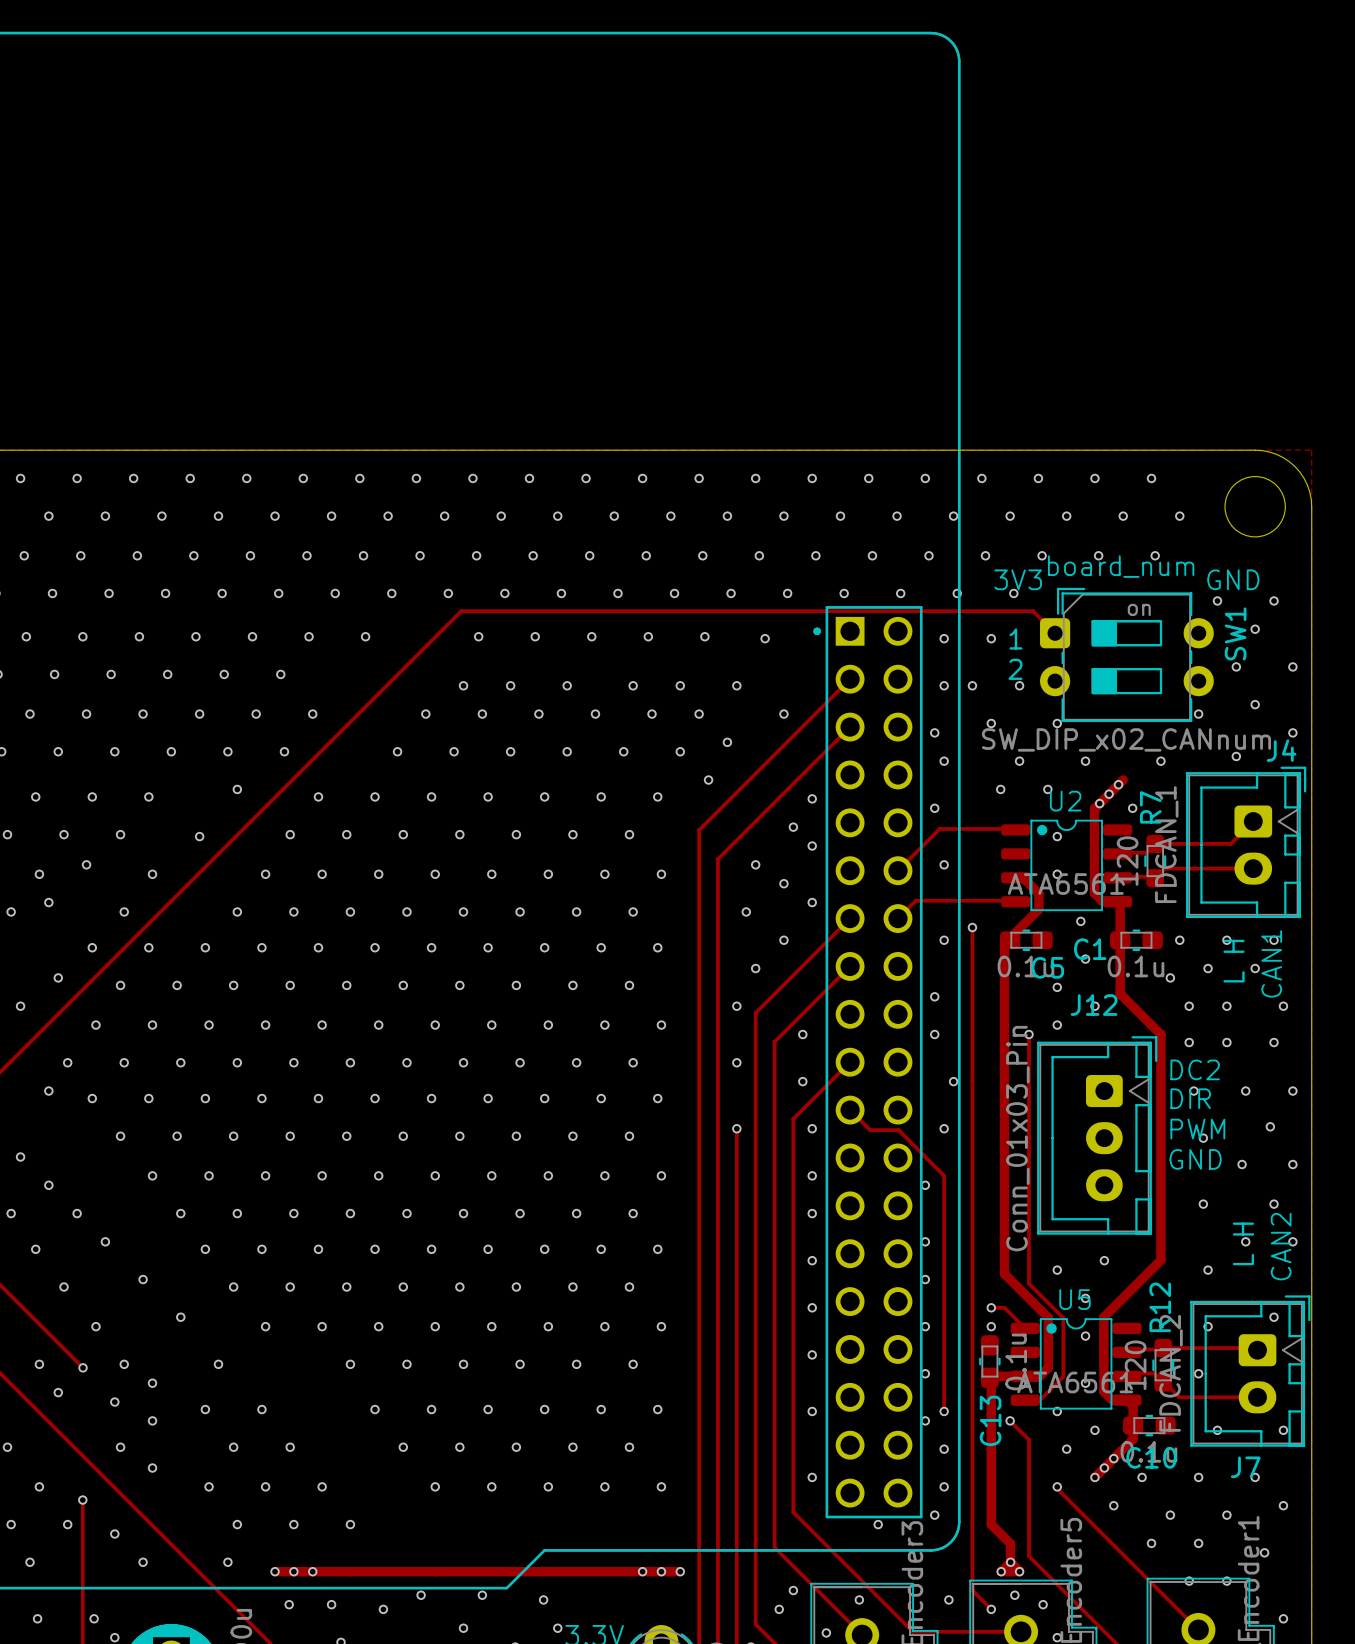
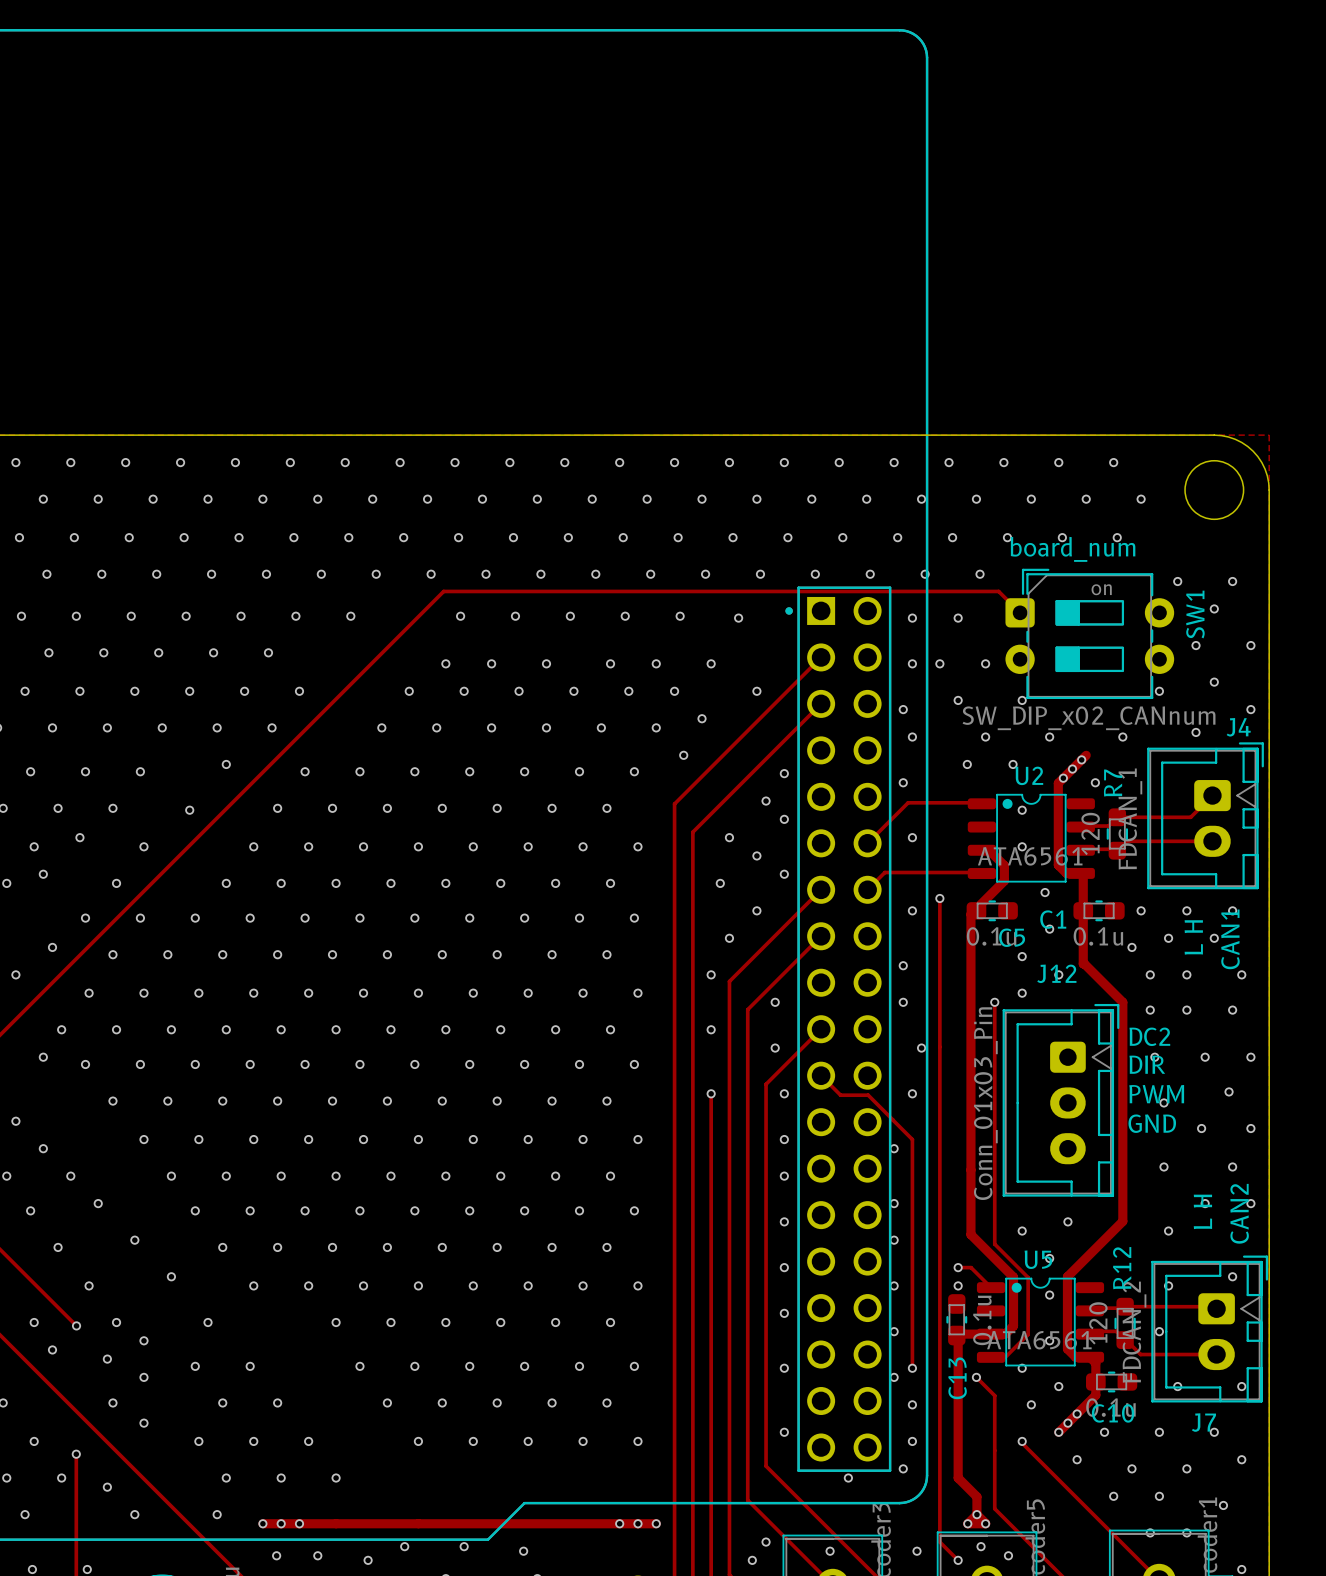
text: 3V3 (1018, 579) -> none
text: GND (1233, 579) -> none
text: 1 (1015, 638) -> none
text: 2 (1015, 669) -> none

